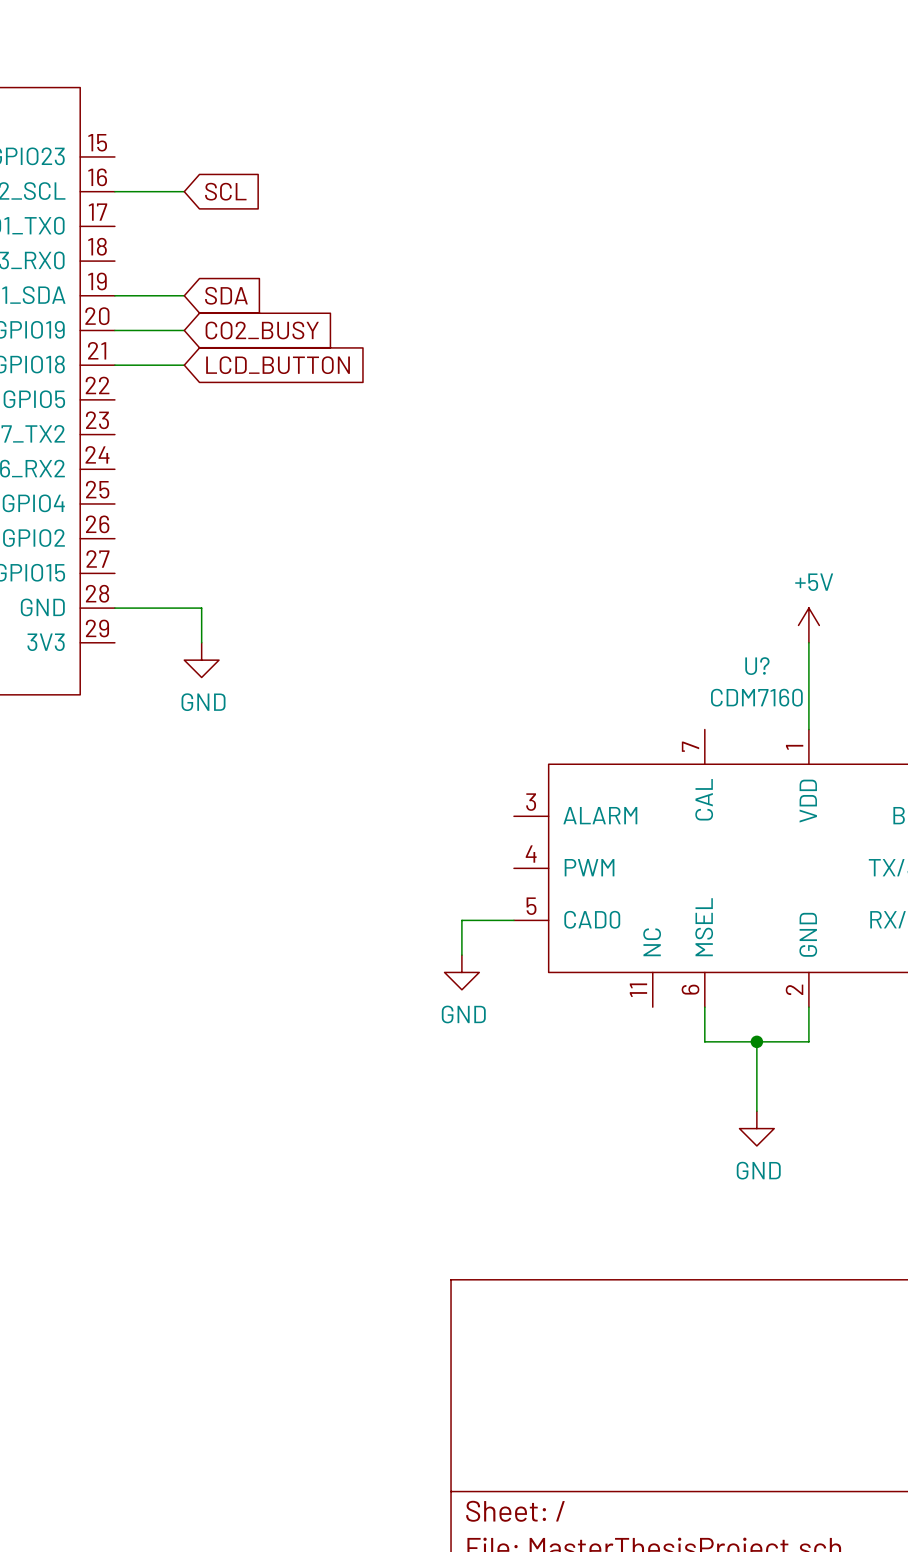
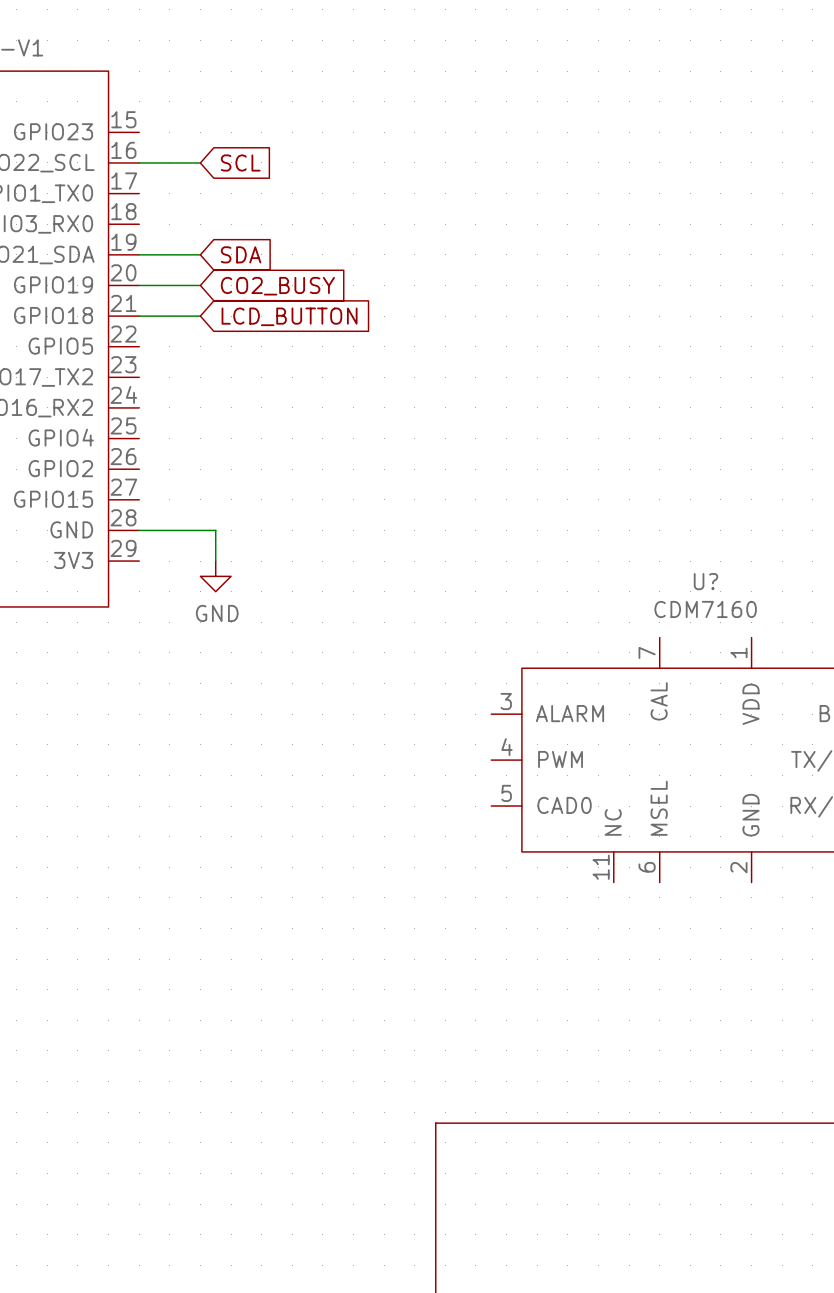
power symbol: +5V (808, 625) -> none
wire: (808, 642) (808, 729) -> none
wire: (513, 920) (461, 920) (461, 955) -> none
power symbol: GND (461, 972) -> none
wire: (704, 1007) (704, 1041) (808, 1041) (808, 1007) -> none
wire: (756, 1041) (756, 1111) -> none
junction: (756, 1041) -> none
power symbol: GND (756, 1128) -> none

